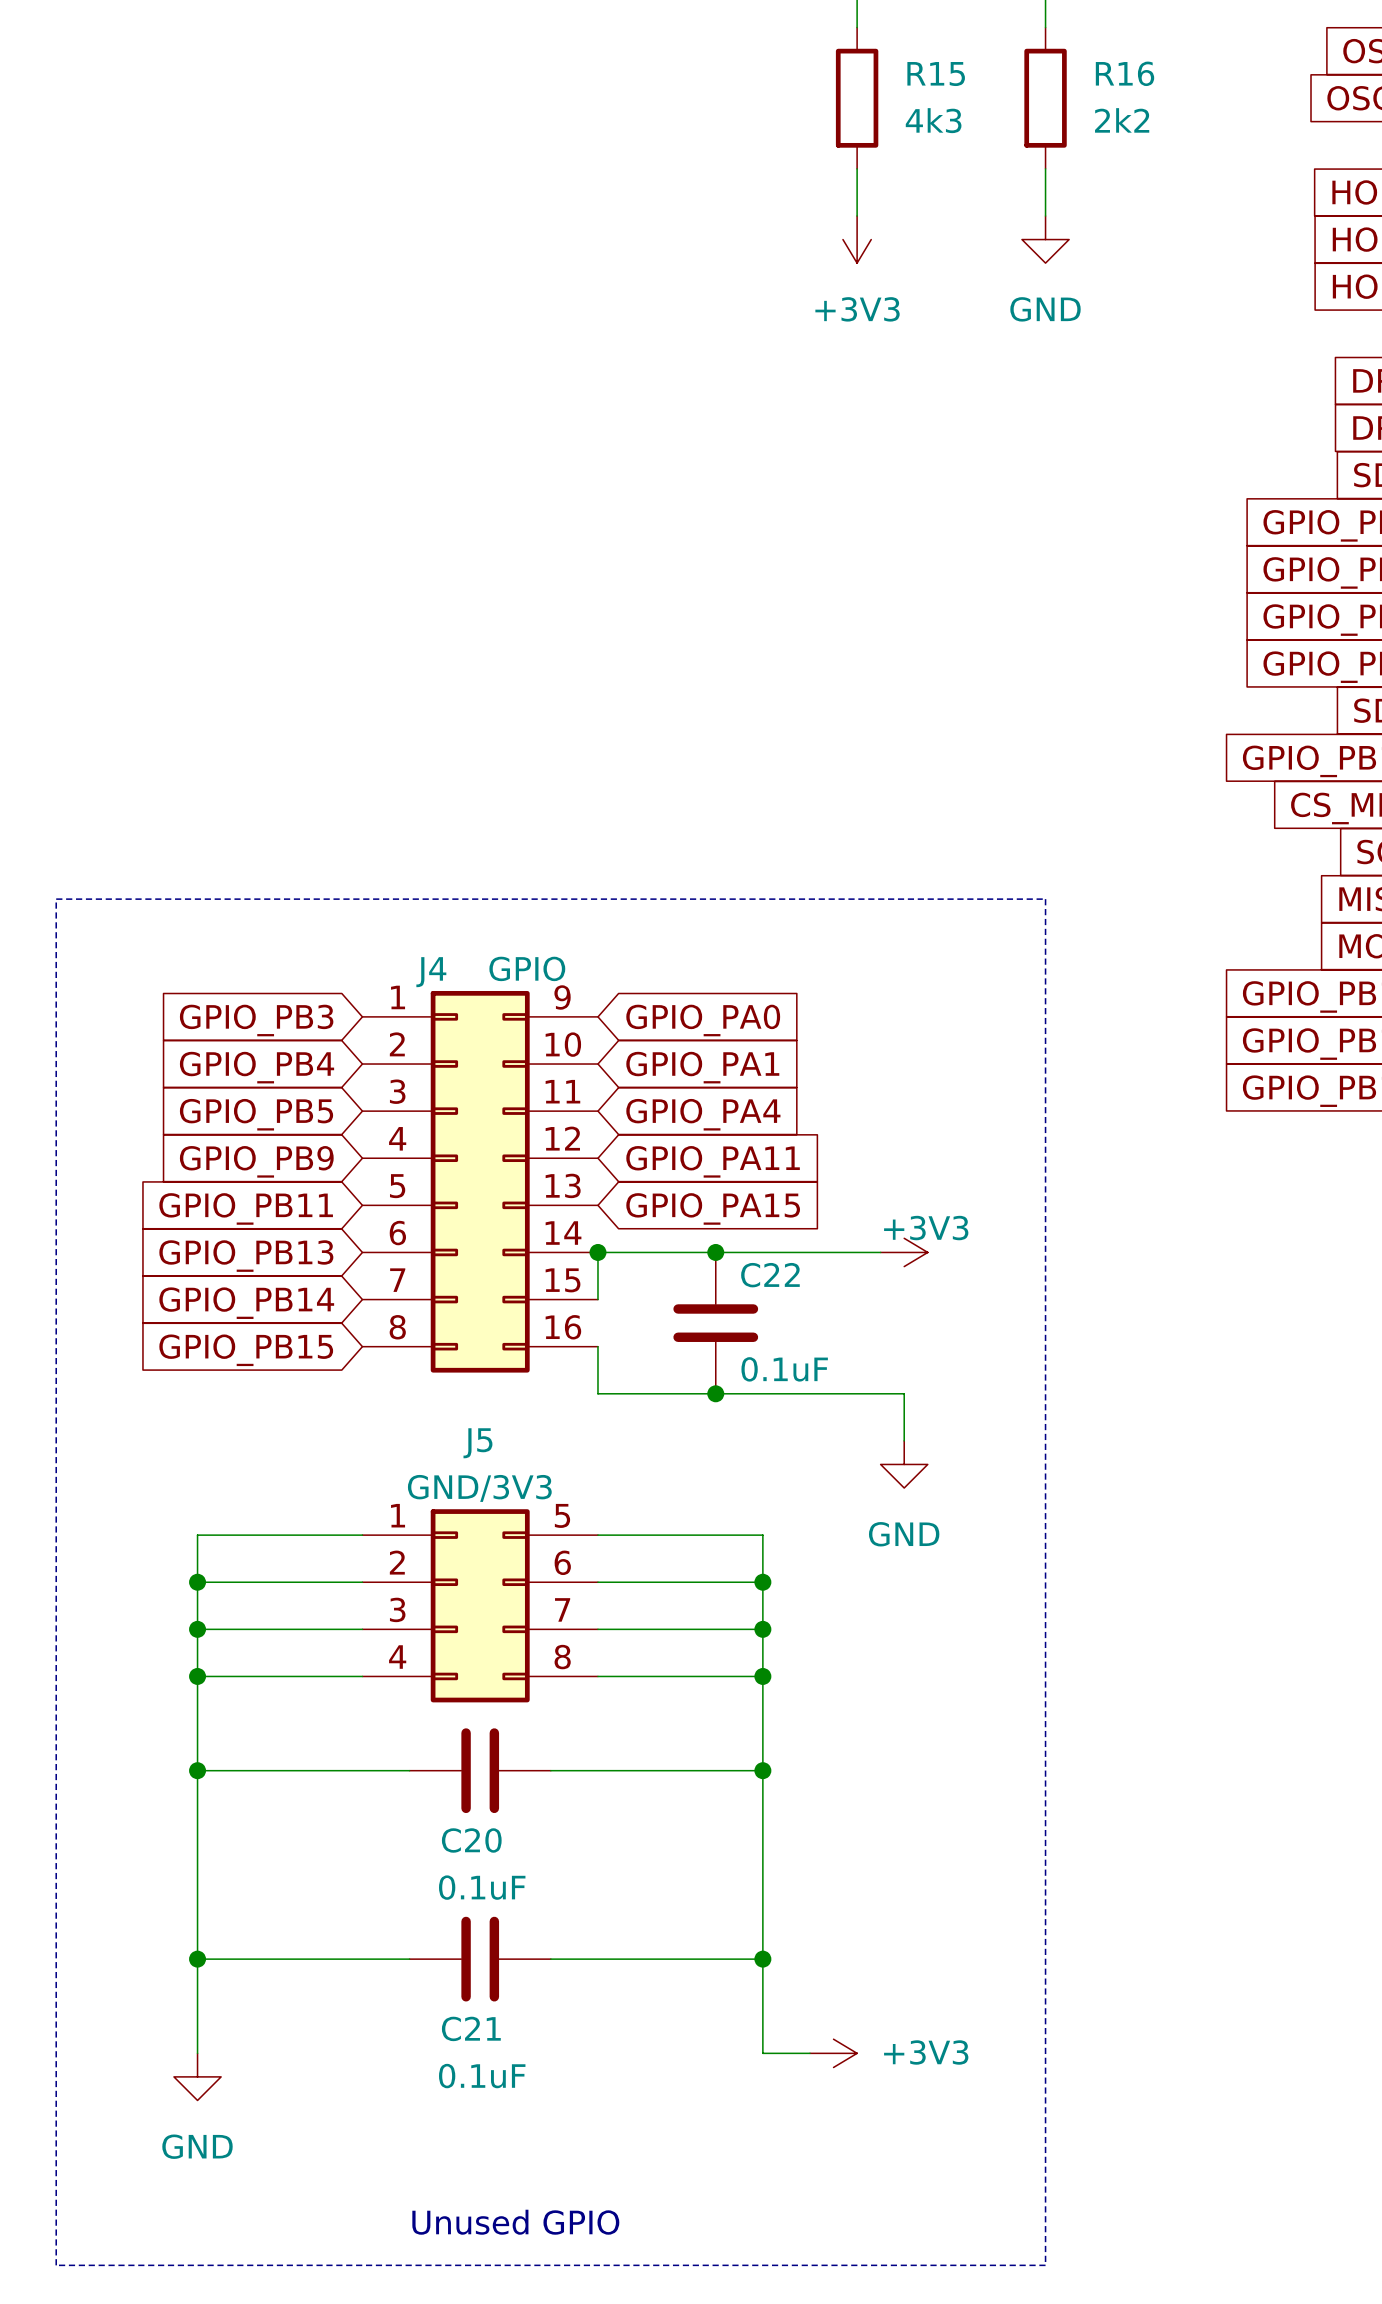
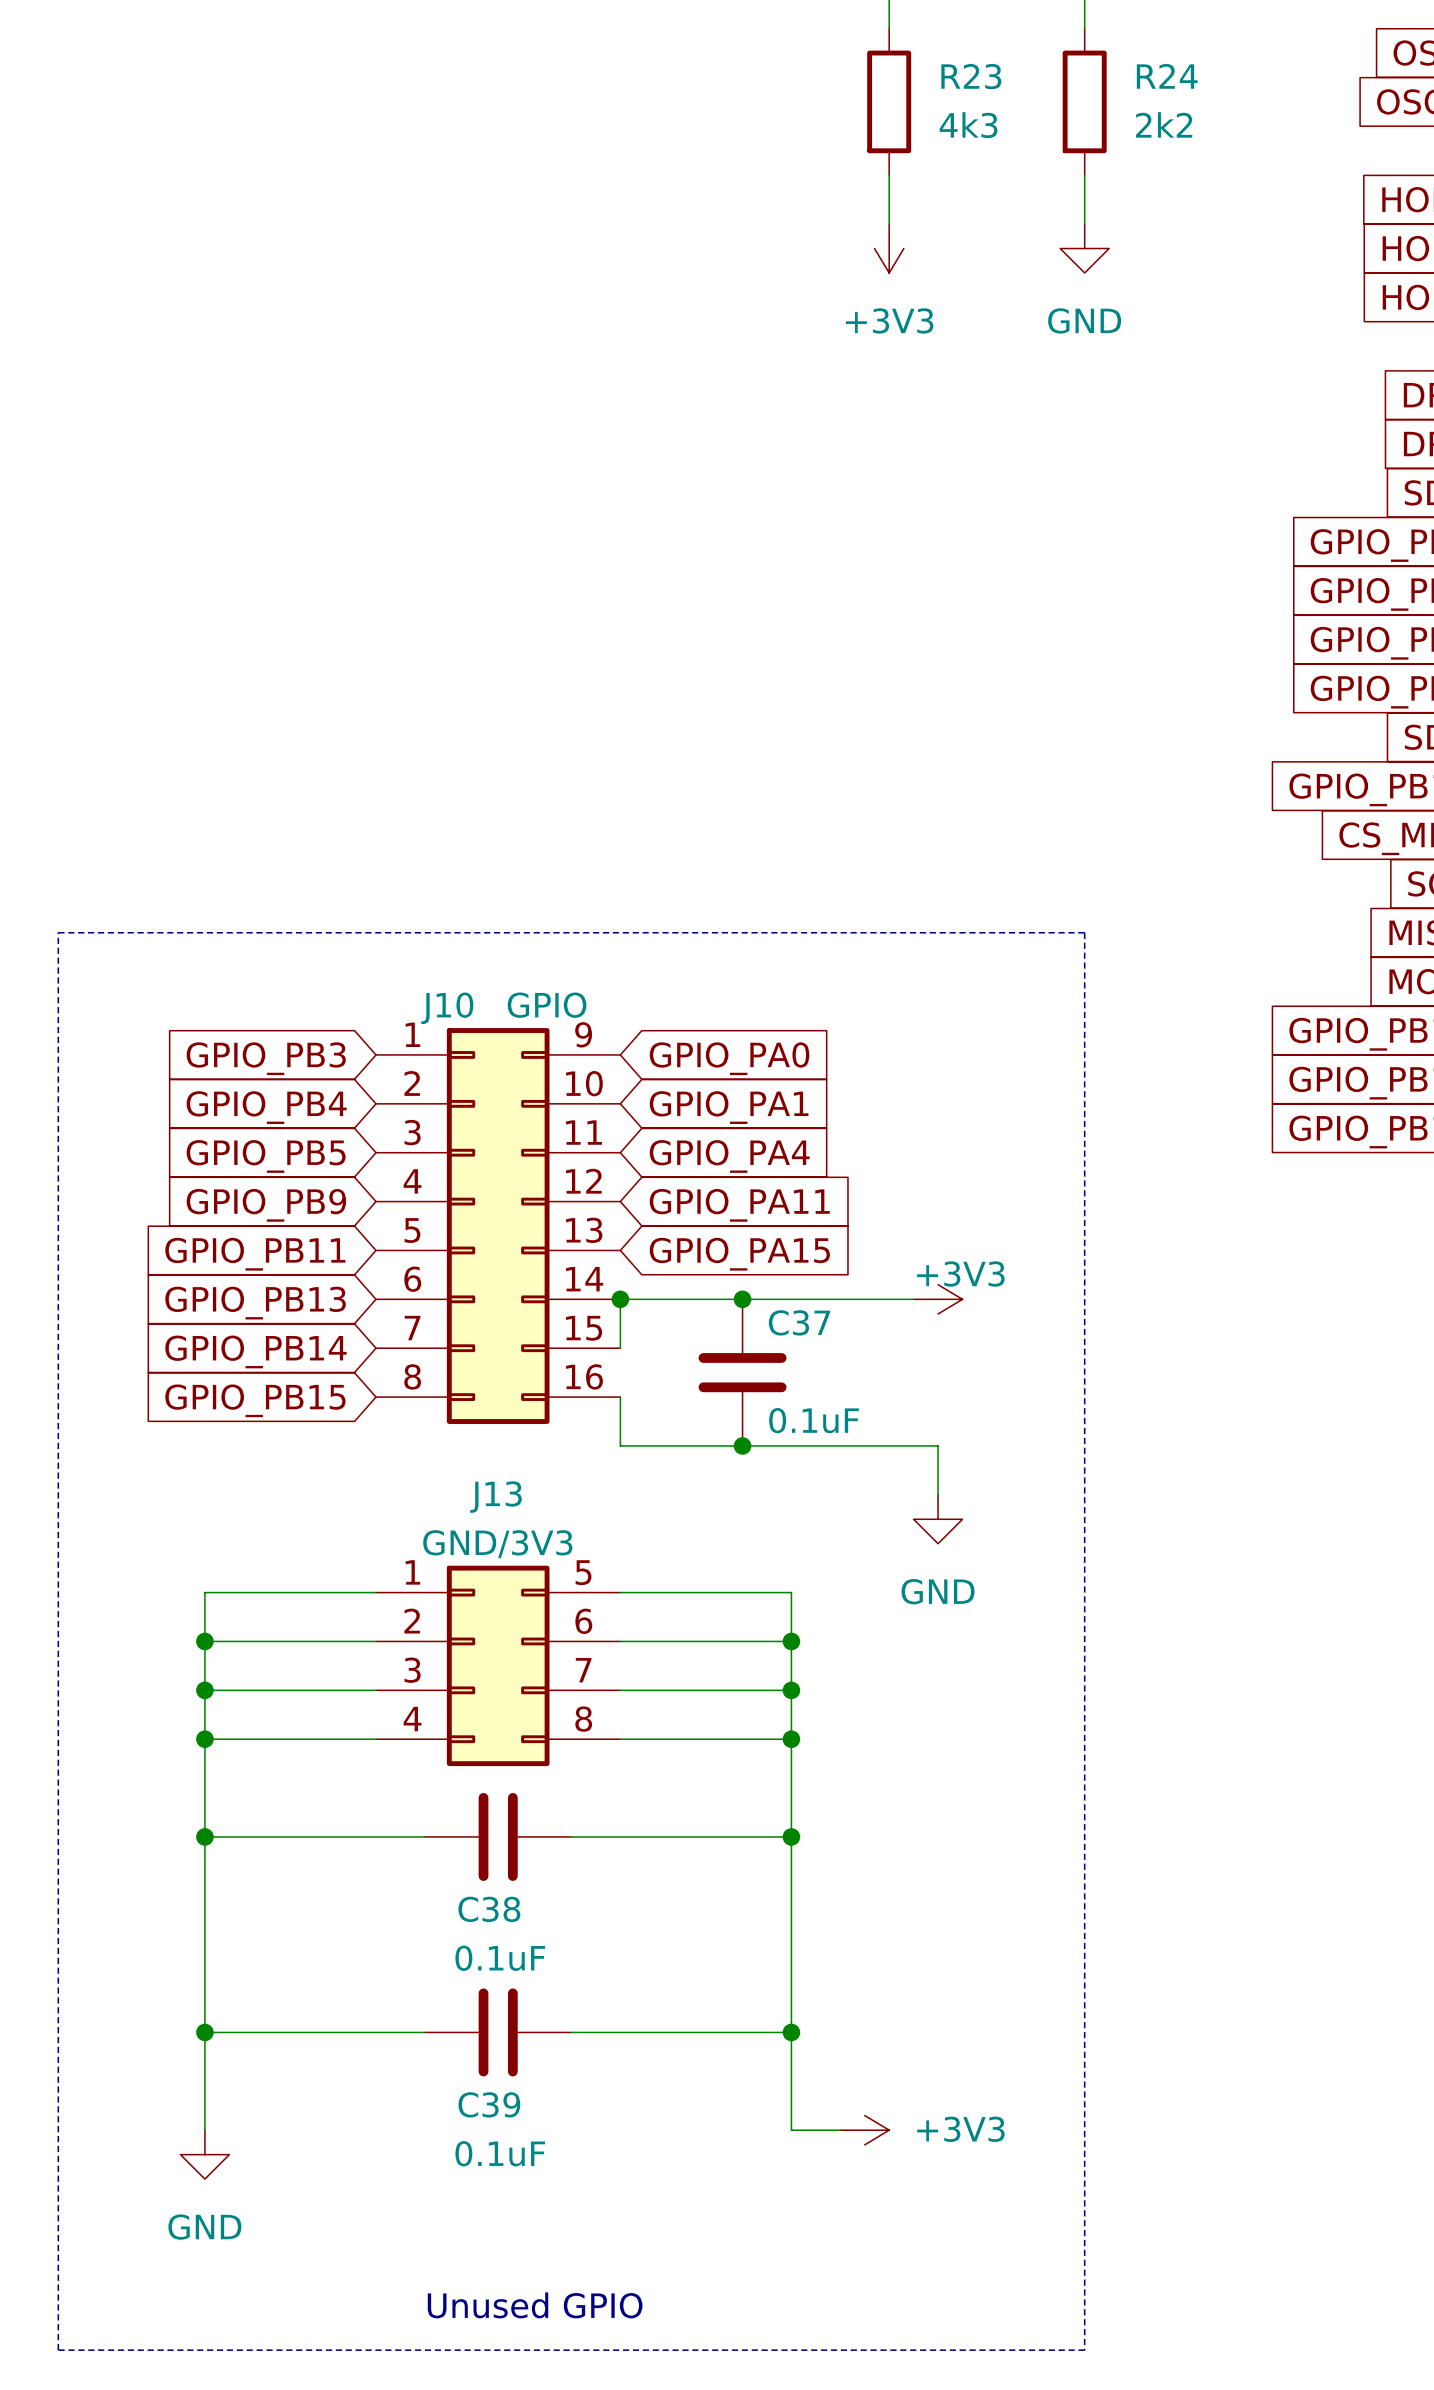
R16 name: R16 (1125, 73) -> R24 (1167, 76)
R15 name: R15 (936, 74) -> R23 (971, 76)
J4 name: J4 (431, 972) -> J10 (447, 1008)
C22 name: C22 (770, 1275) -> C37 (799, 1322)
J5 name: J5 (477, 1443) -> J13 (495, 1497)
C20 name: C20 (471, 1840) -> C38 (489, 1909)
C21 name: C21 (471, 2028) -> C39 (489, 2104)

